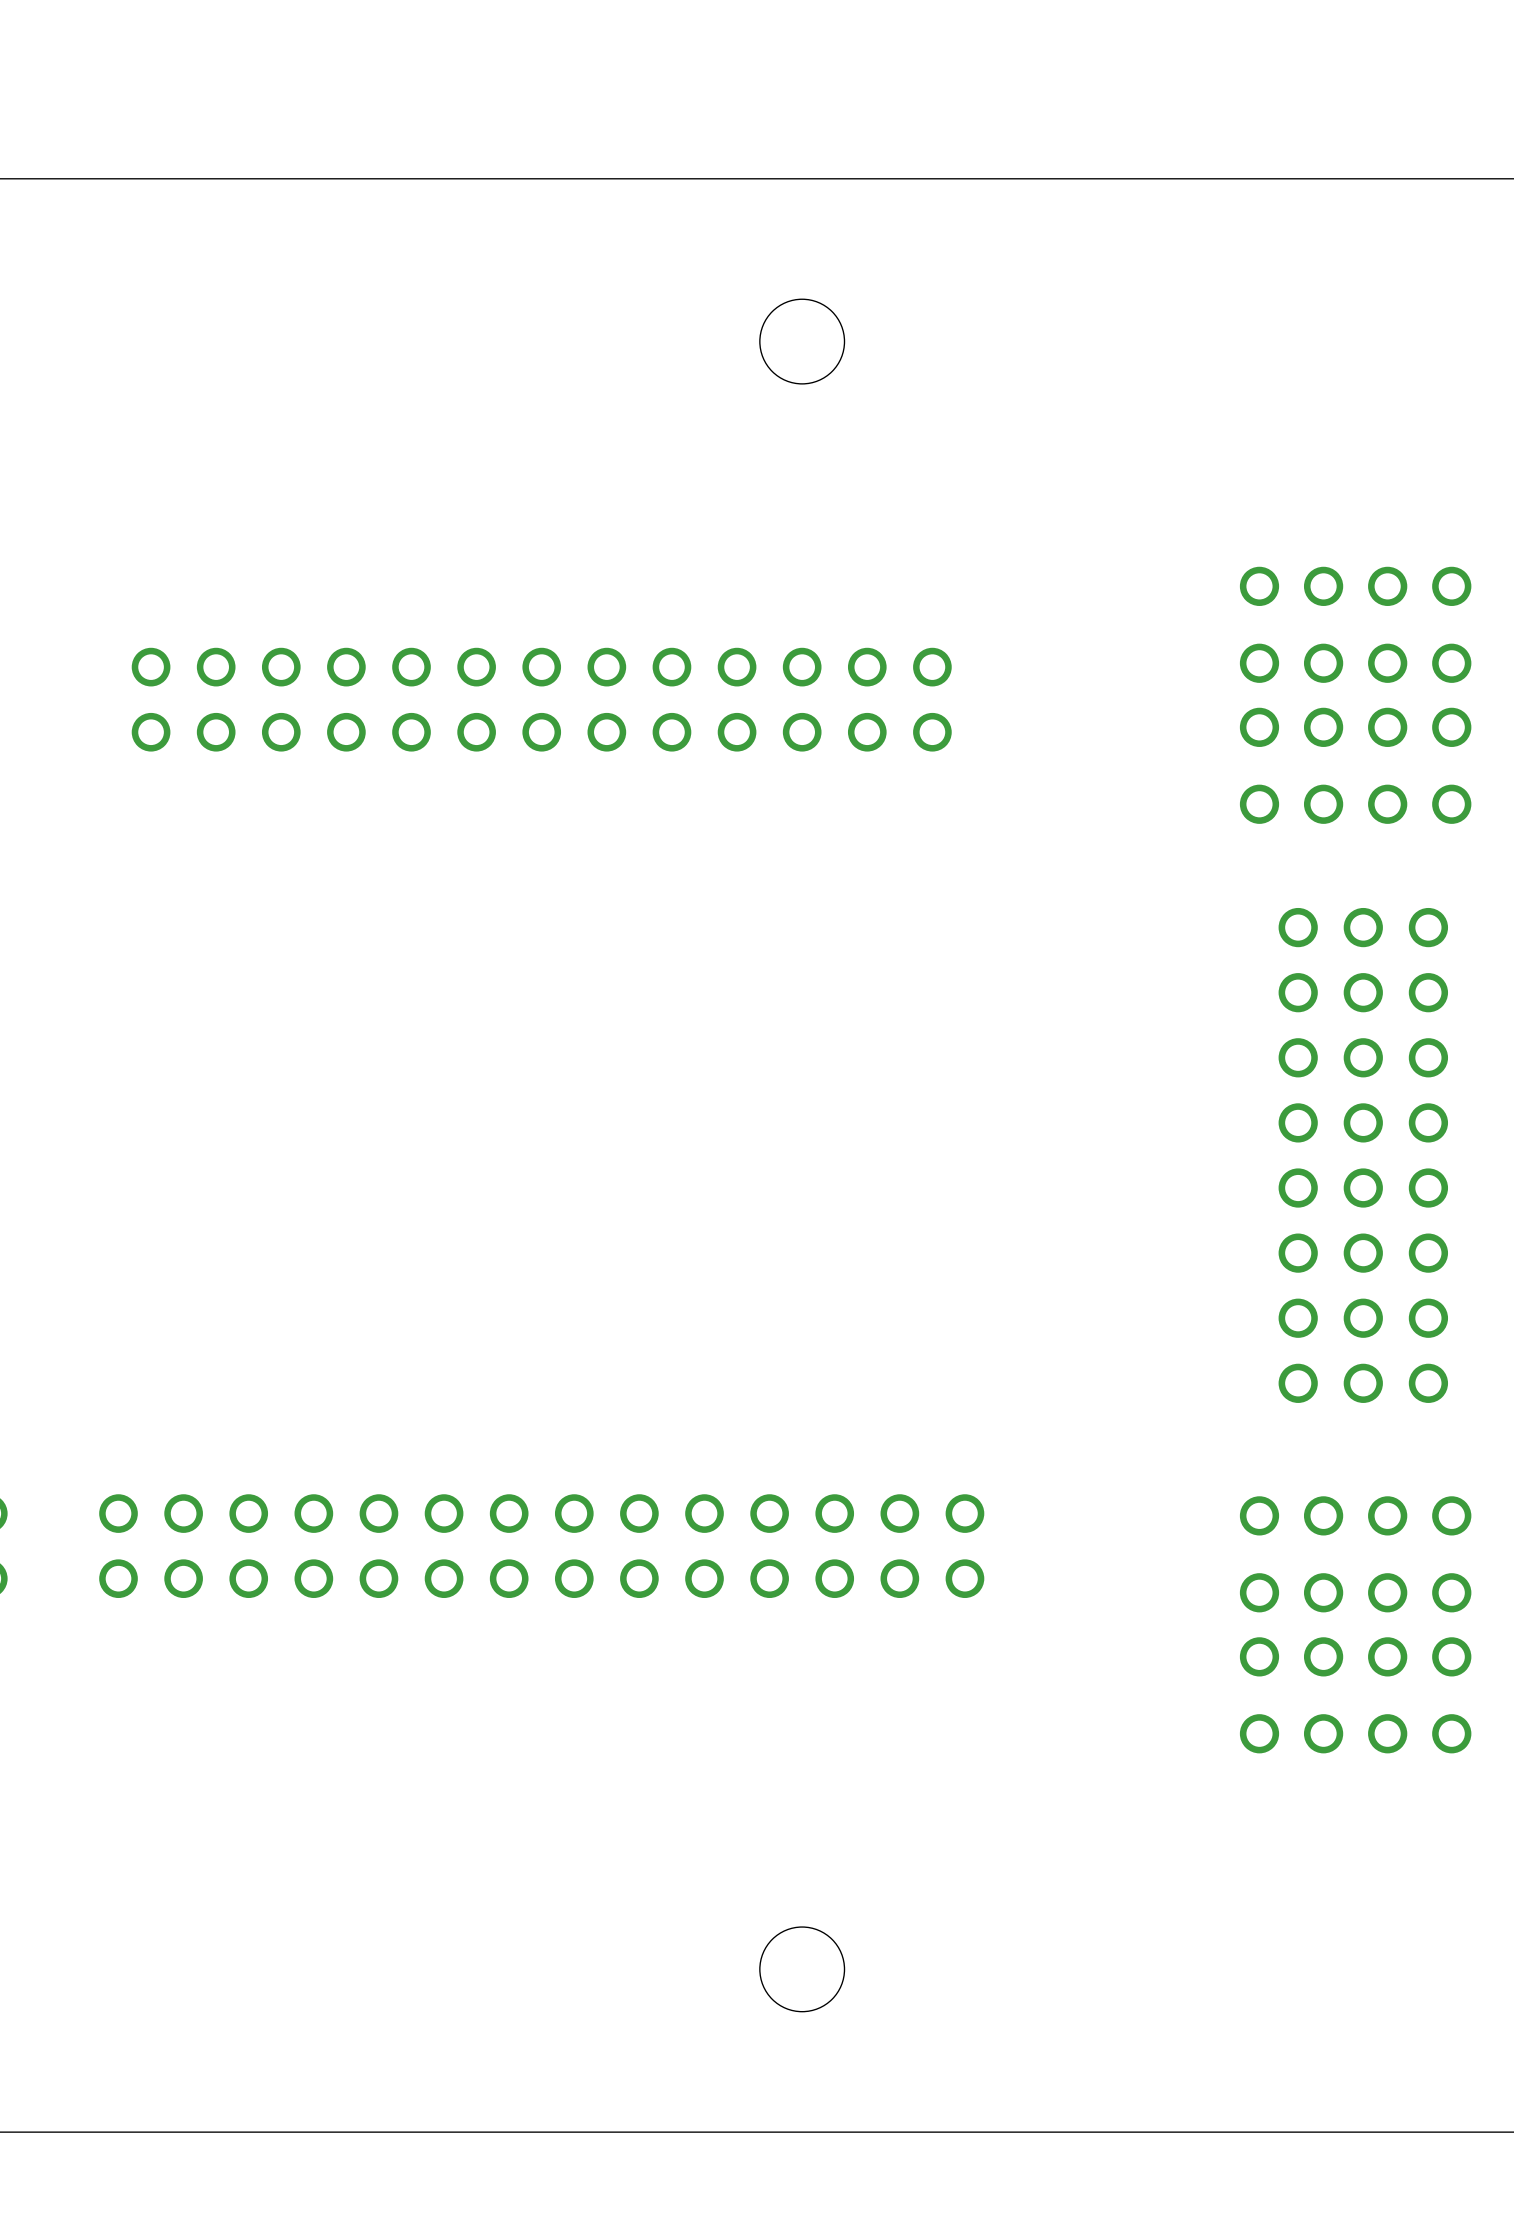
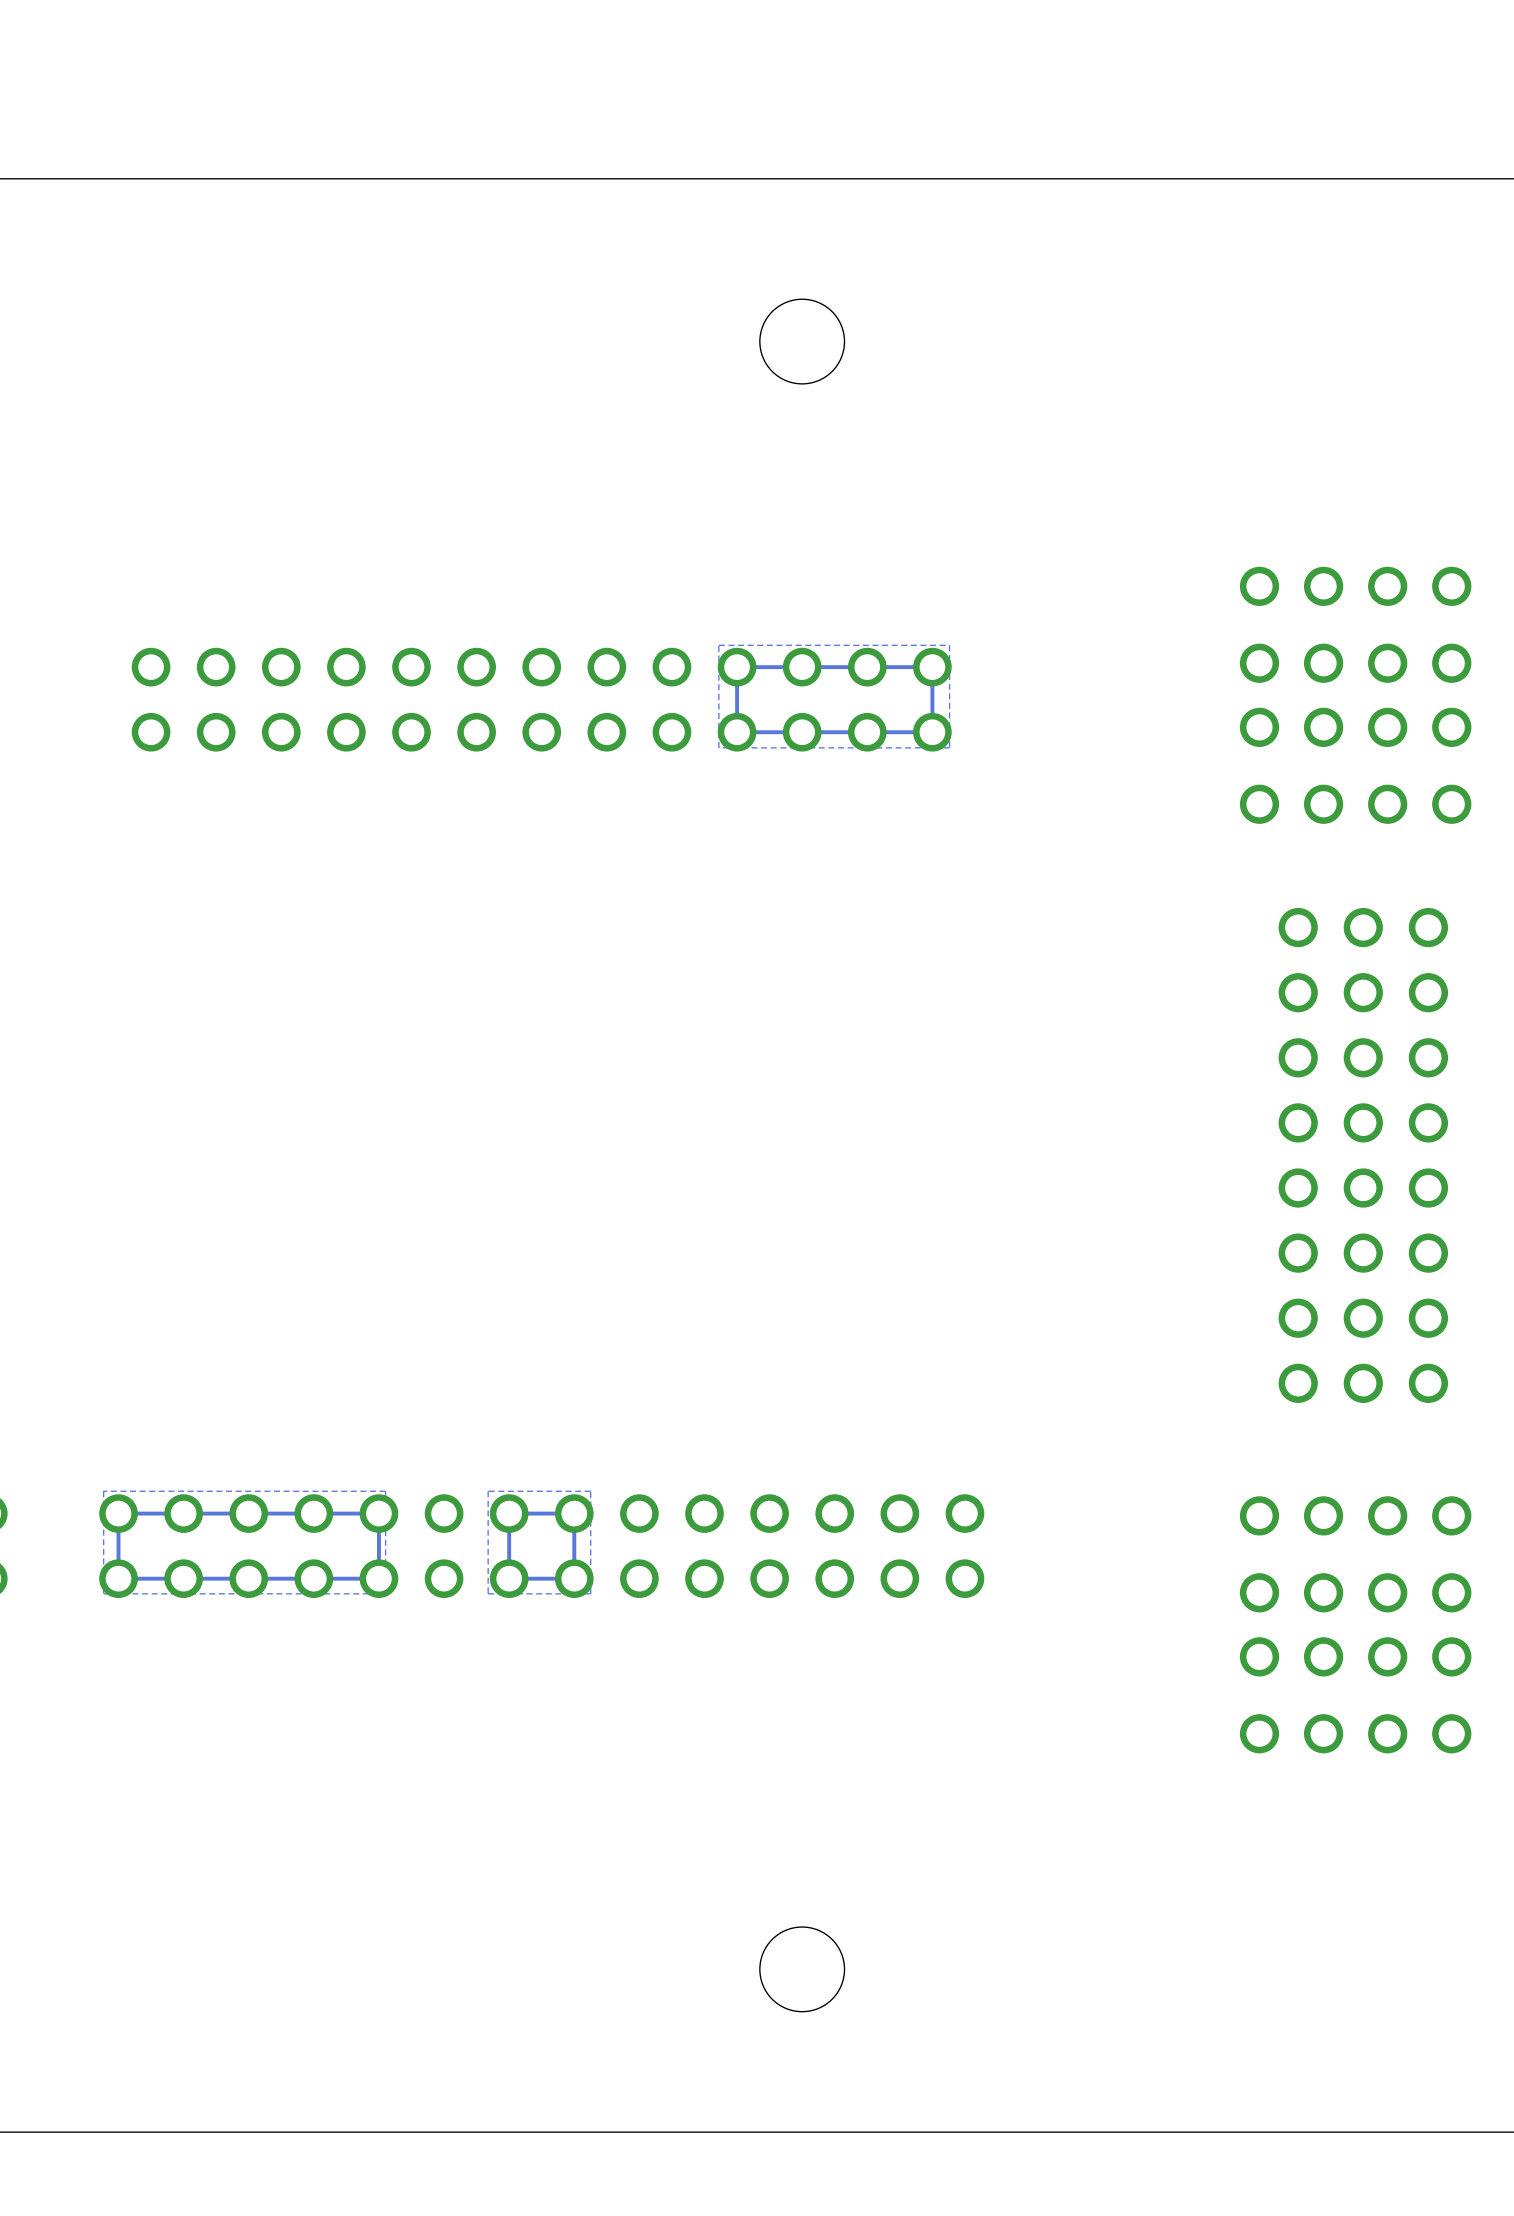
zone outline: none -> (949, 645) (949, 747) (718, 747) (718, 645) (949, 645)
track: none -> (932, 667) (737, 667) (737, 732) (932, 732) (932, 667)
zone outline: none -> (385, 1491) (103, 1491) (103, 1593) (385, 1593) (385, 1491)
zone outline: none -> (590, 1491) (488, 1491) (488, 1593) (590, 1593) (590, 1491)
track: none -> (378, 1513) (118, 1513) (118, 1578) (378, 1578) (378, 1513)
track: none -> (574, 1513) (509, 1513) (509, 1578) (574, 1578) (574, 1513)

